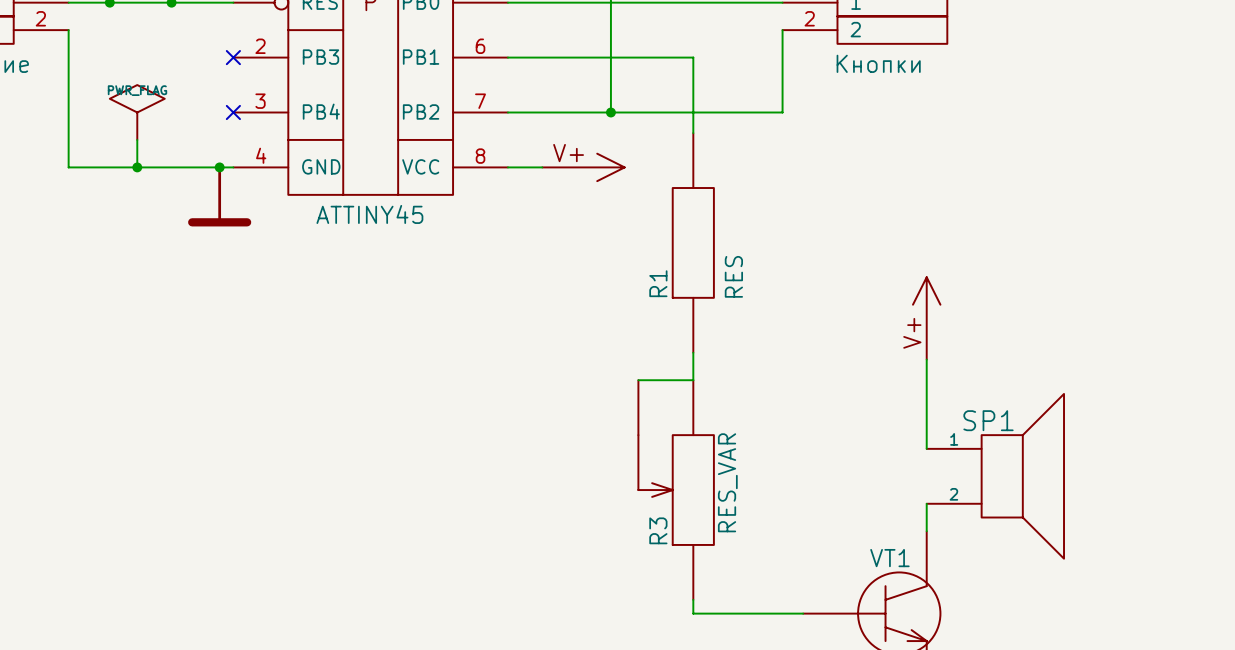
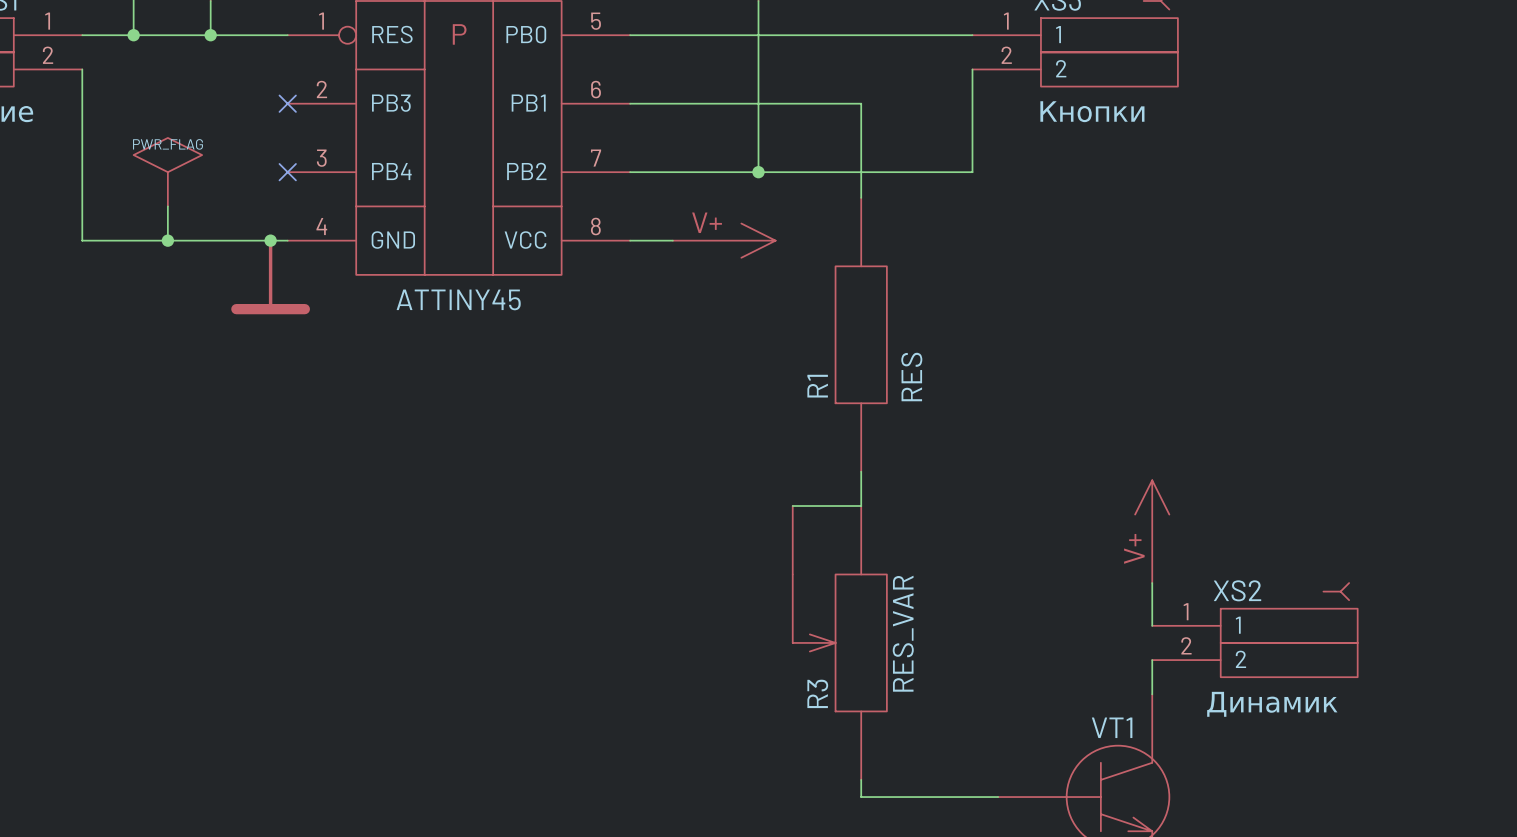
power symbol position: (926, 318) -> (1152, 531)
wire: none -> (1152, 591) (1152, 625)
SP1: (995, 476) -> none
XS2: none -> Динамик (1254, 630)

